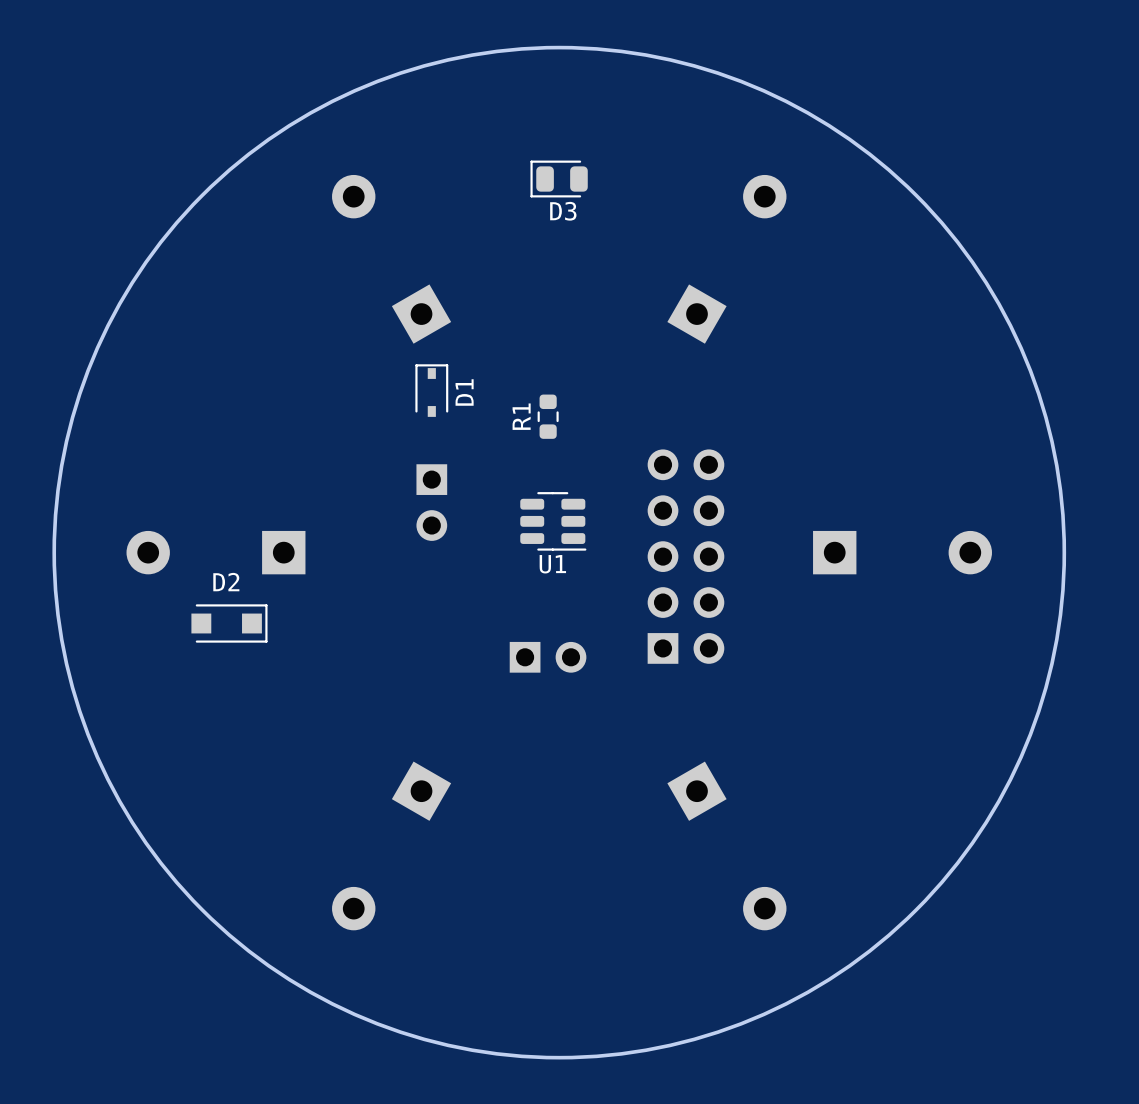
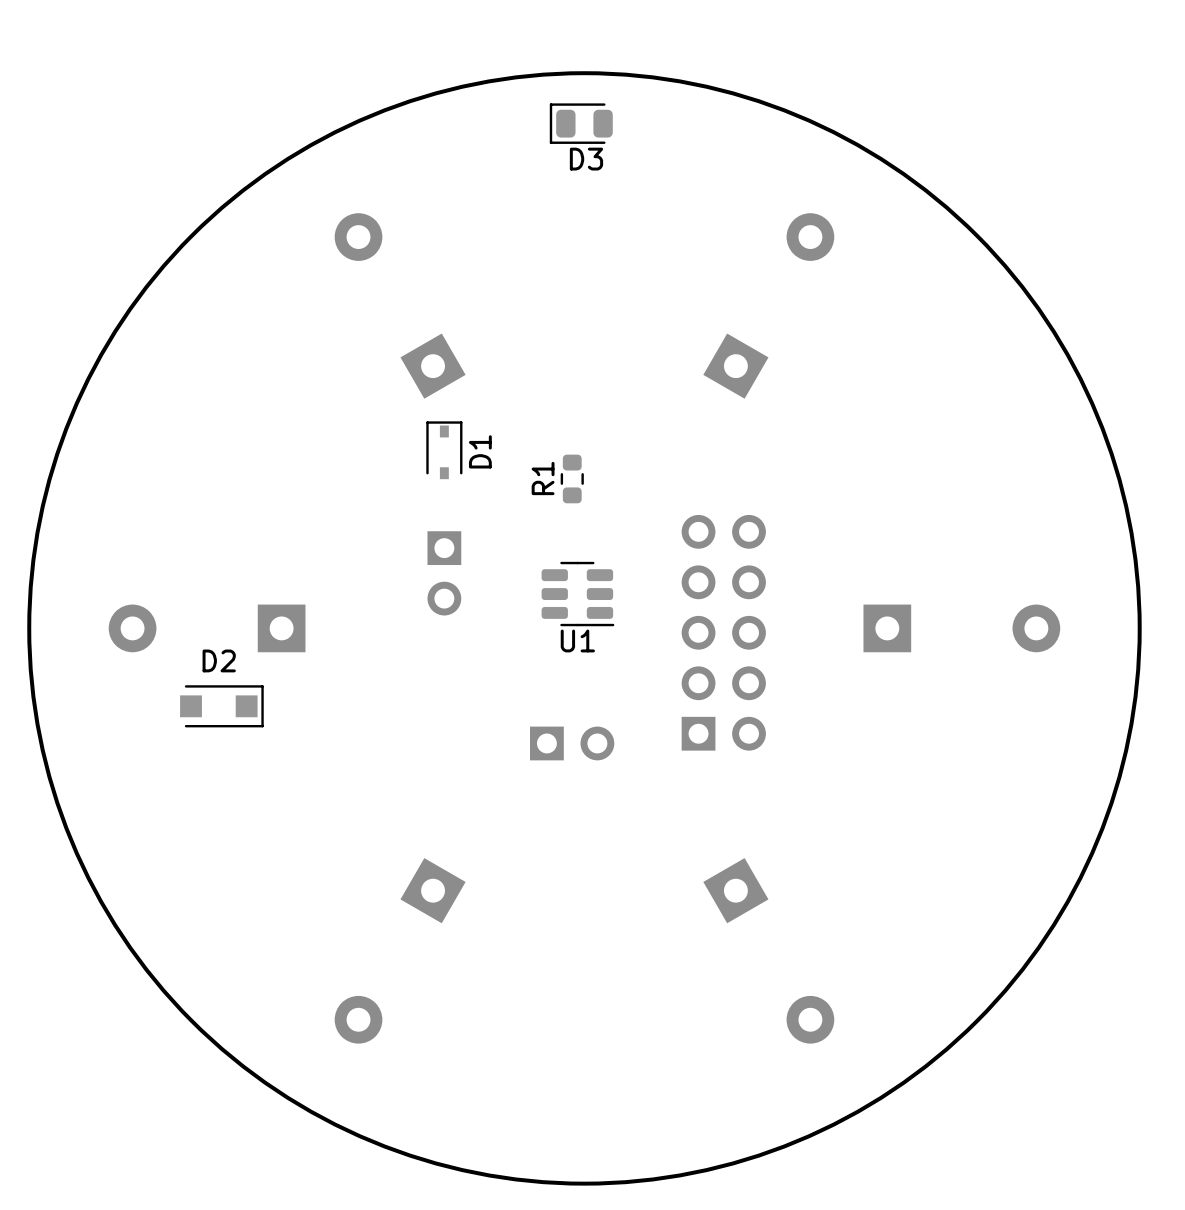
D3 position: (559, 179) -> (581, 123)

